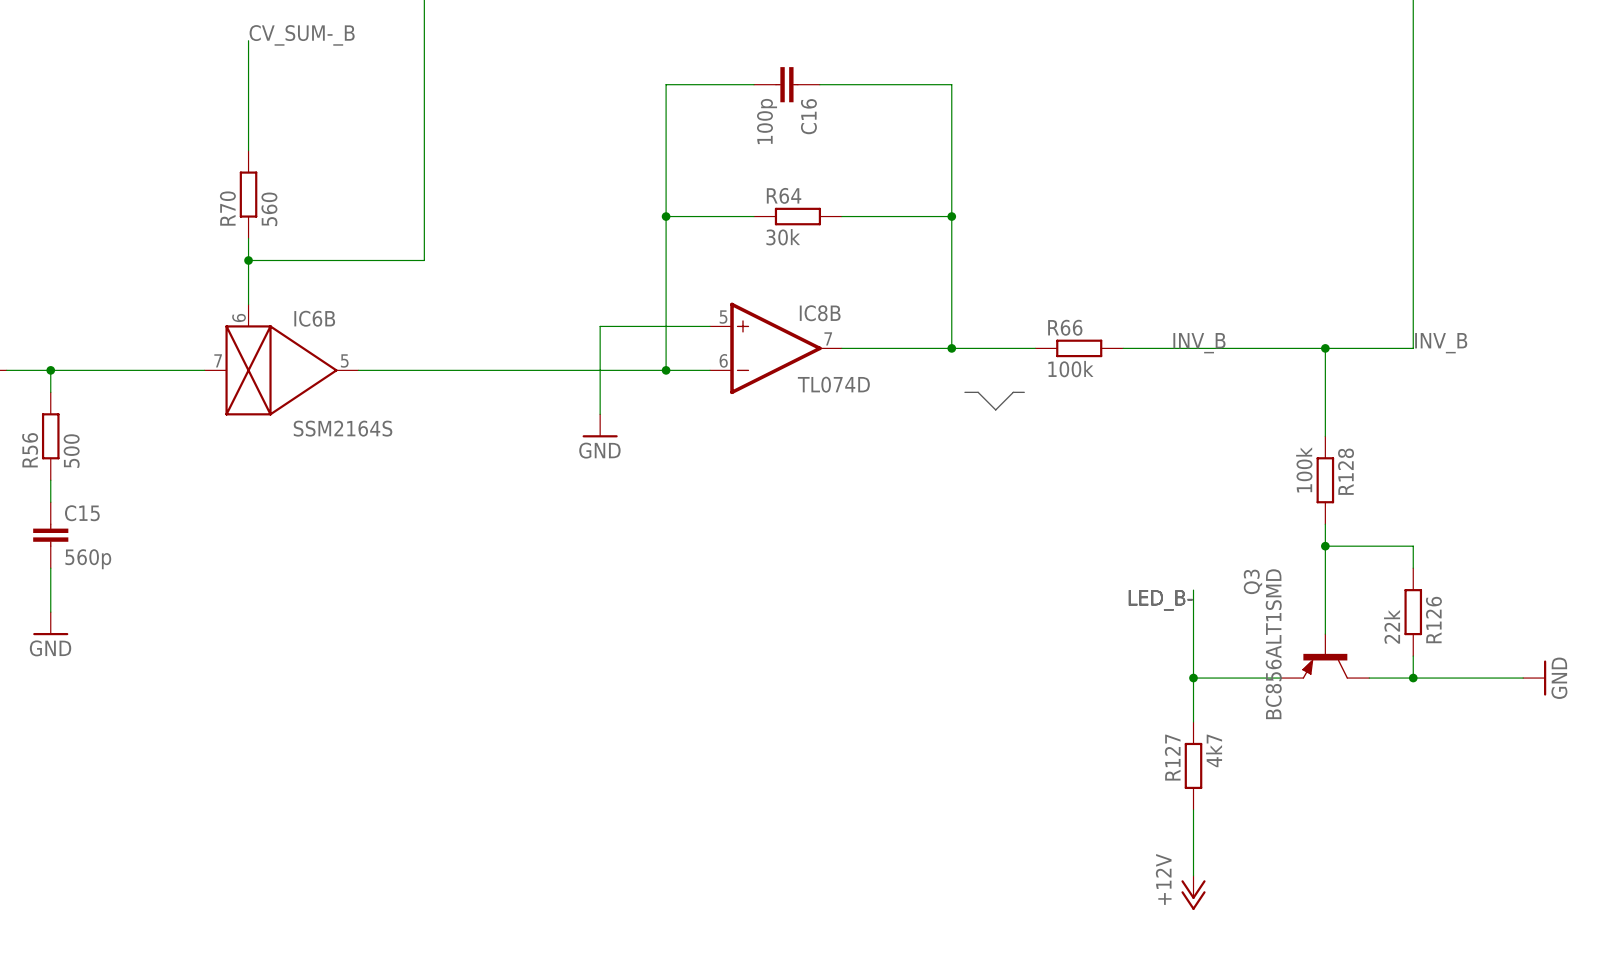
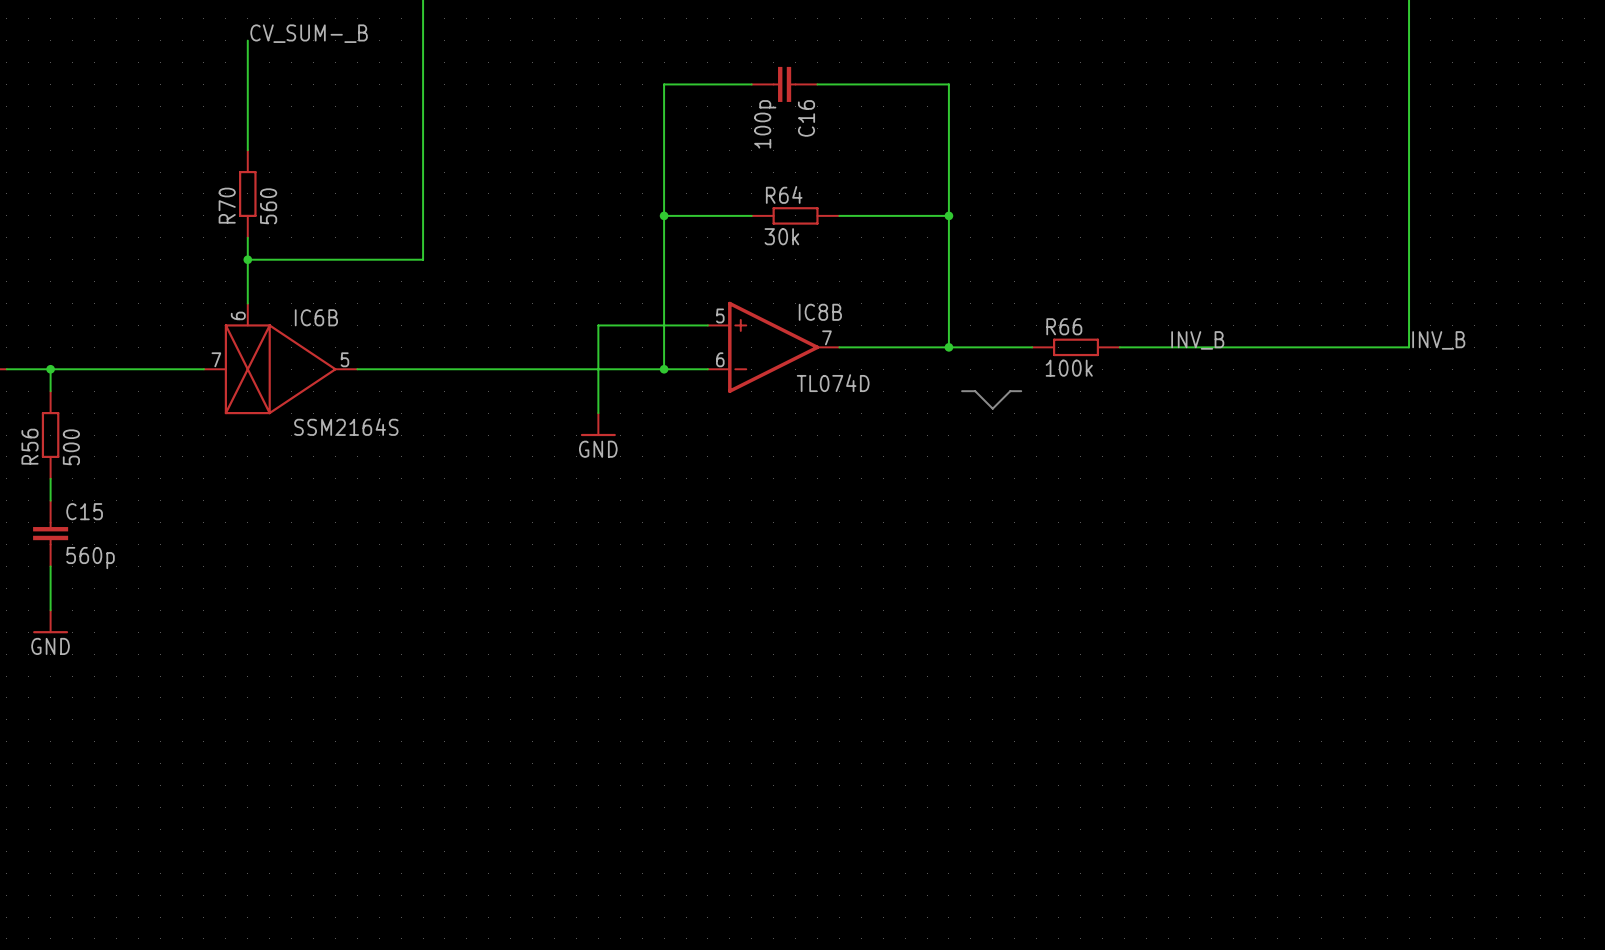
wire: (1325, 348) (1325, 436) -> none
junction: (1325, 348) -> none
R128: 100k (1325, 480) -> none
wire: (1325, 524) (1325, 634) -> none
wire: (1325, 546) (1413, 546) (1413, 568) -> none
junction: (1325, 546) -> none
wire: (1193, 590) (1193, 721) -> none
label: LED_B- (1160, 600) -> none
R126: 22k (1413, 612) -> none
Q3: BC856ALT1SMD (1325, 656) -> none
wire: (1413, 656) (1413, 678) -> none
wire: (1193, 678) (1281, 678) -> none
junction: (1193, 678) -> none
wire: (1369, 678) (1523, 678) -> none
junction: (1413, 678) -> none
power symbol: GND (1534, 678) -> none
R127: 4k7 (1193, 765) -> none
wire: (1193, 809) (1193, 875) -> none
power symbol: +12V (1193, 892) -> none

